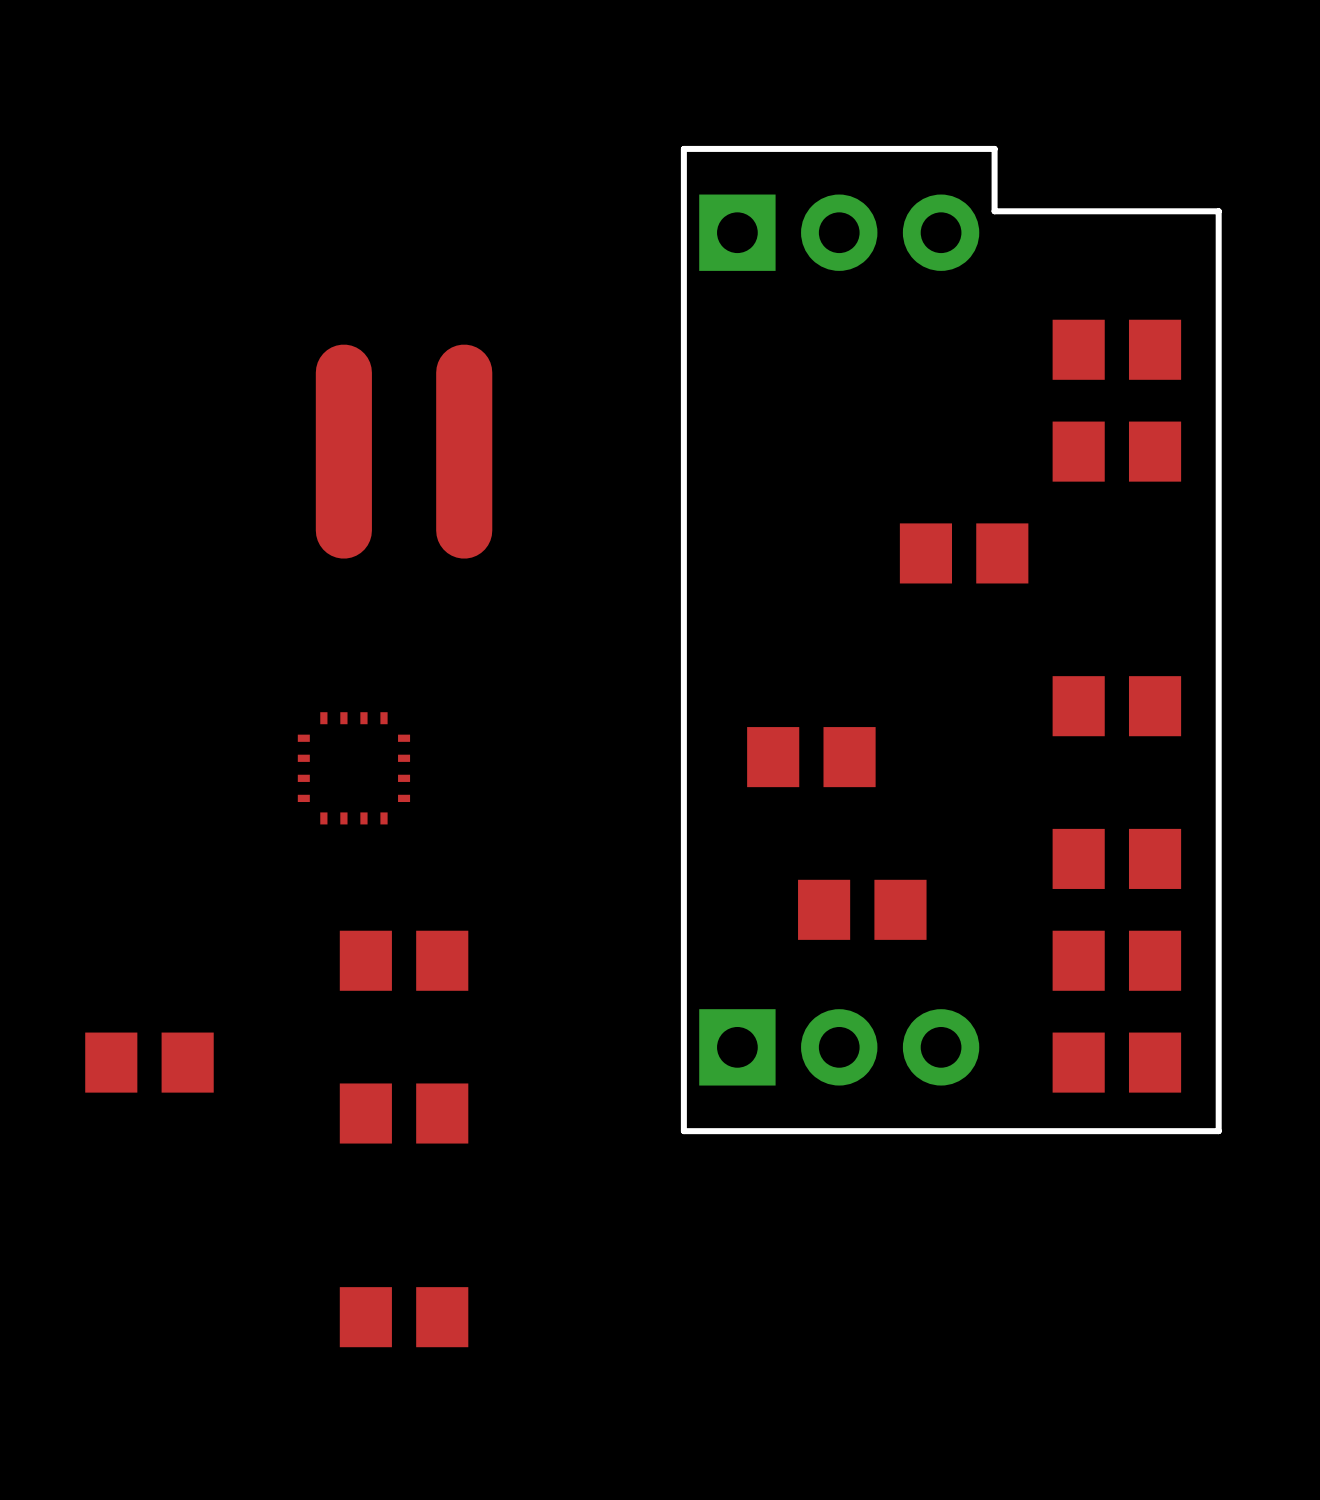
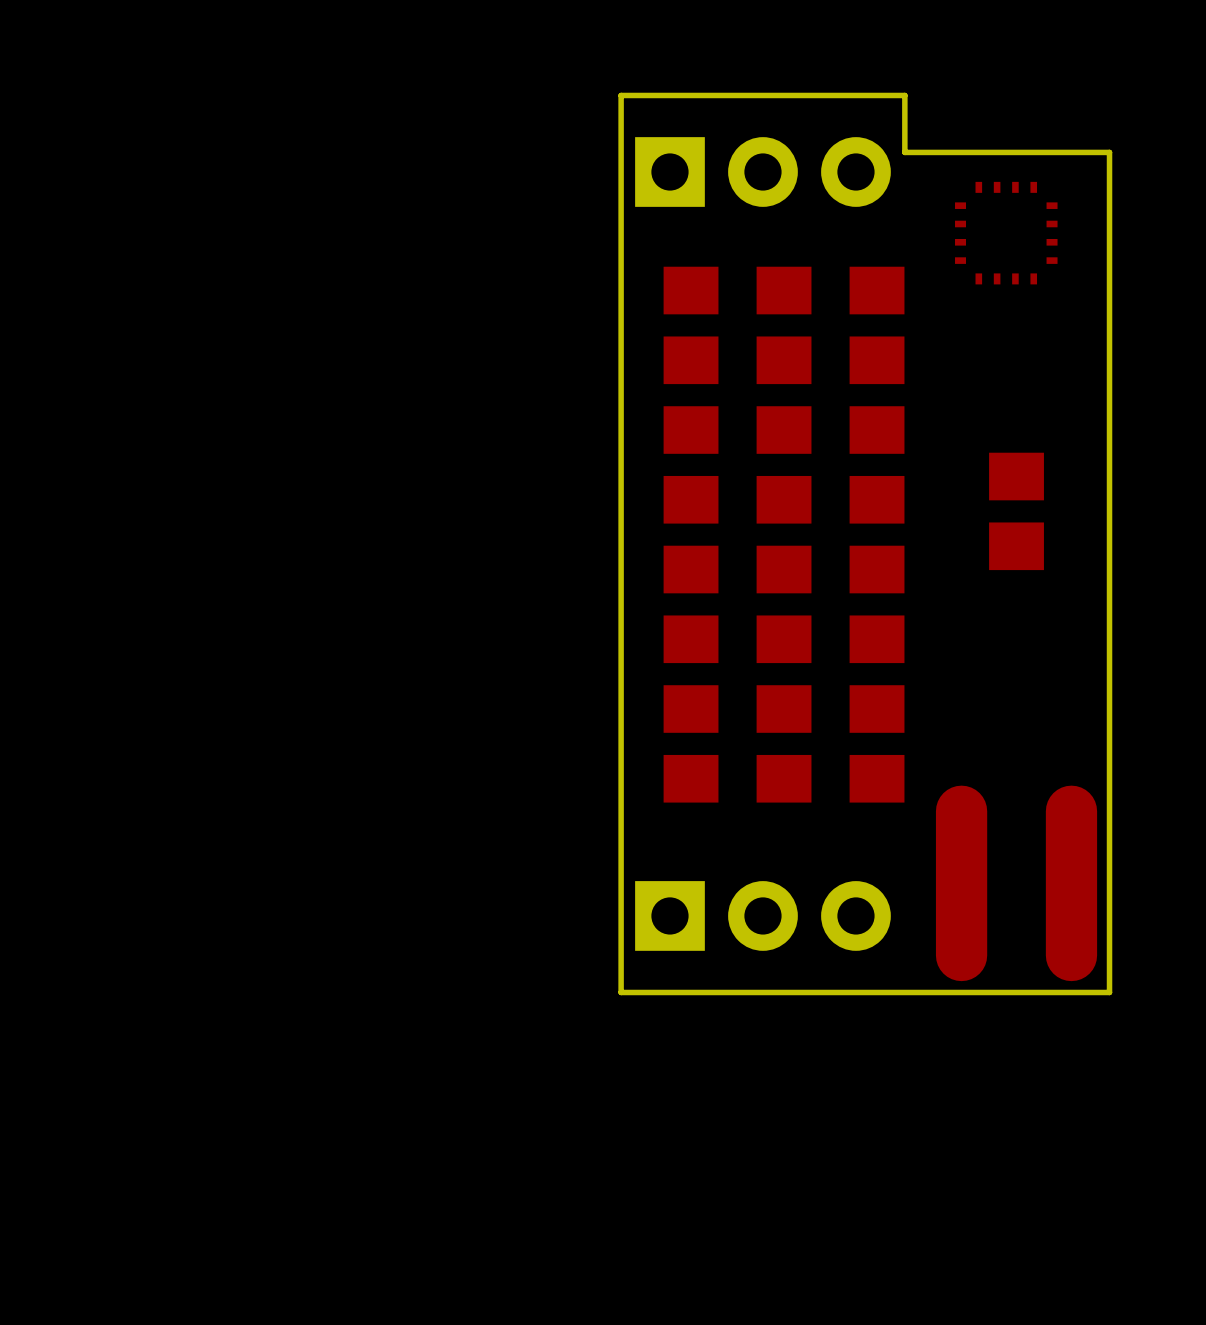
part: (1116, 349) -> none
part: none -> (691, 325)
part: none -> (784, 325)
part: none -> (877, 325)
part position: (404, 451) -> (1016, 883)
part: (1116, 451) -> none
part: none -> (691, 464)
part: none -> (784, 464)
part rotation: 0° (964, 553) -> 90° clockwise (877, 464)
part: none -> (1016, 511)
part: none -> (691, 604)
part: none -> (784, 604)
part: none -> (877, 604)
part: (1116, 706) -> none
part: (811, 757) -> none
part position: (353, 768) -> (1006, 233)
part: none -> (691, 743)
part: none -> (877, 743)
part: (1116, 858) -> none
part rotation: 0° (862, 909) -> 90° clockwise (784, 743)
part: (404, 960) -> none
part: (1116, 960) -> none
part: (149, 1062) -> none
part: (1116, 1062) -> none
part: (404, 1113) -> none
part: (404, 1317) -> none

